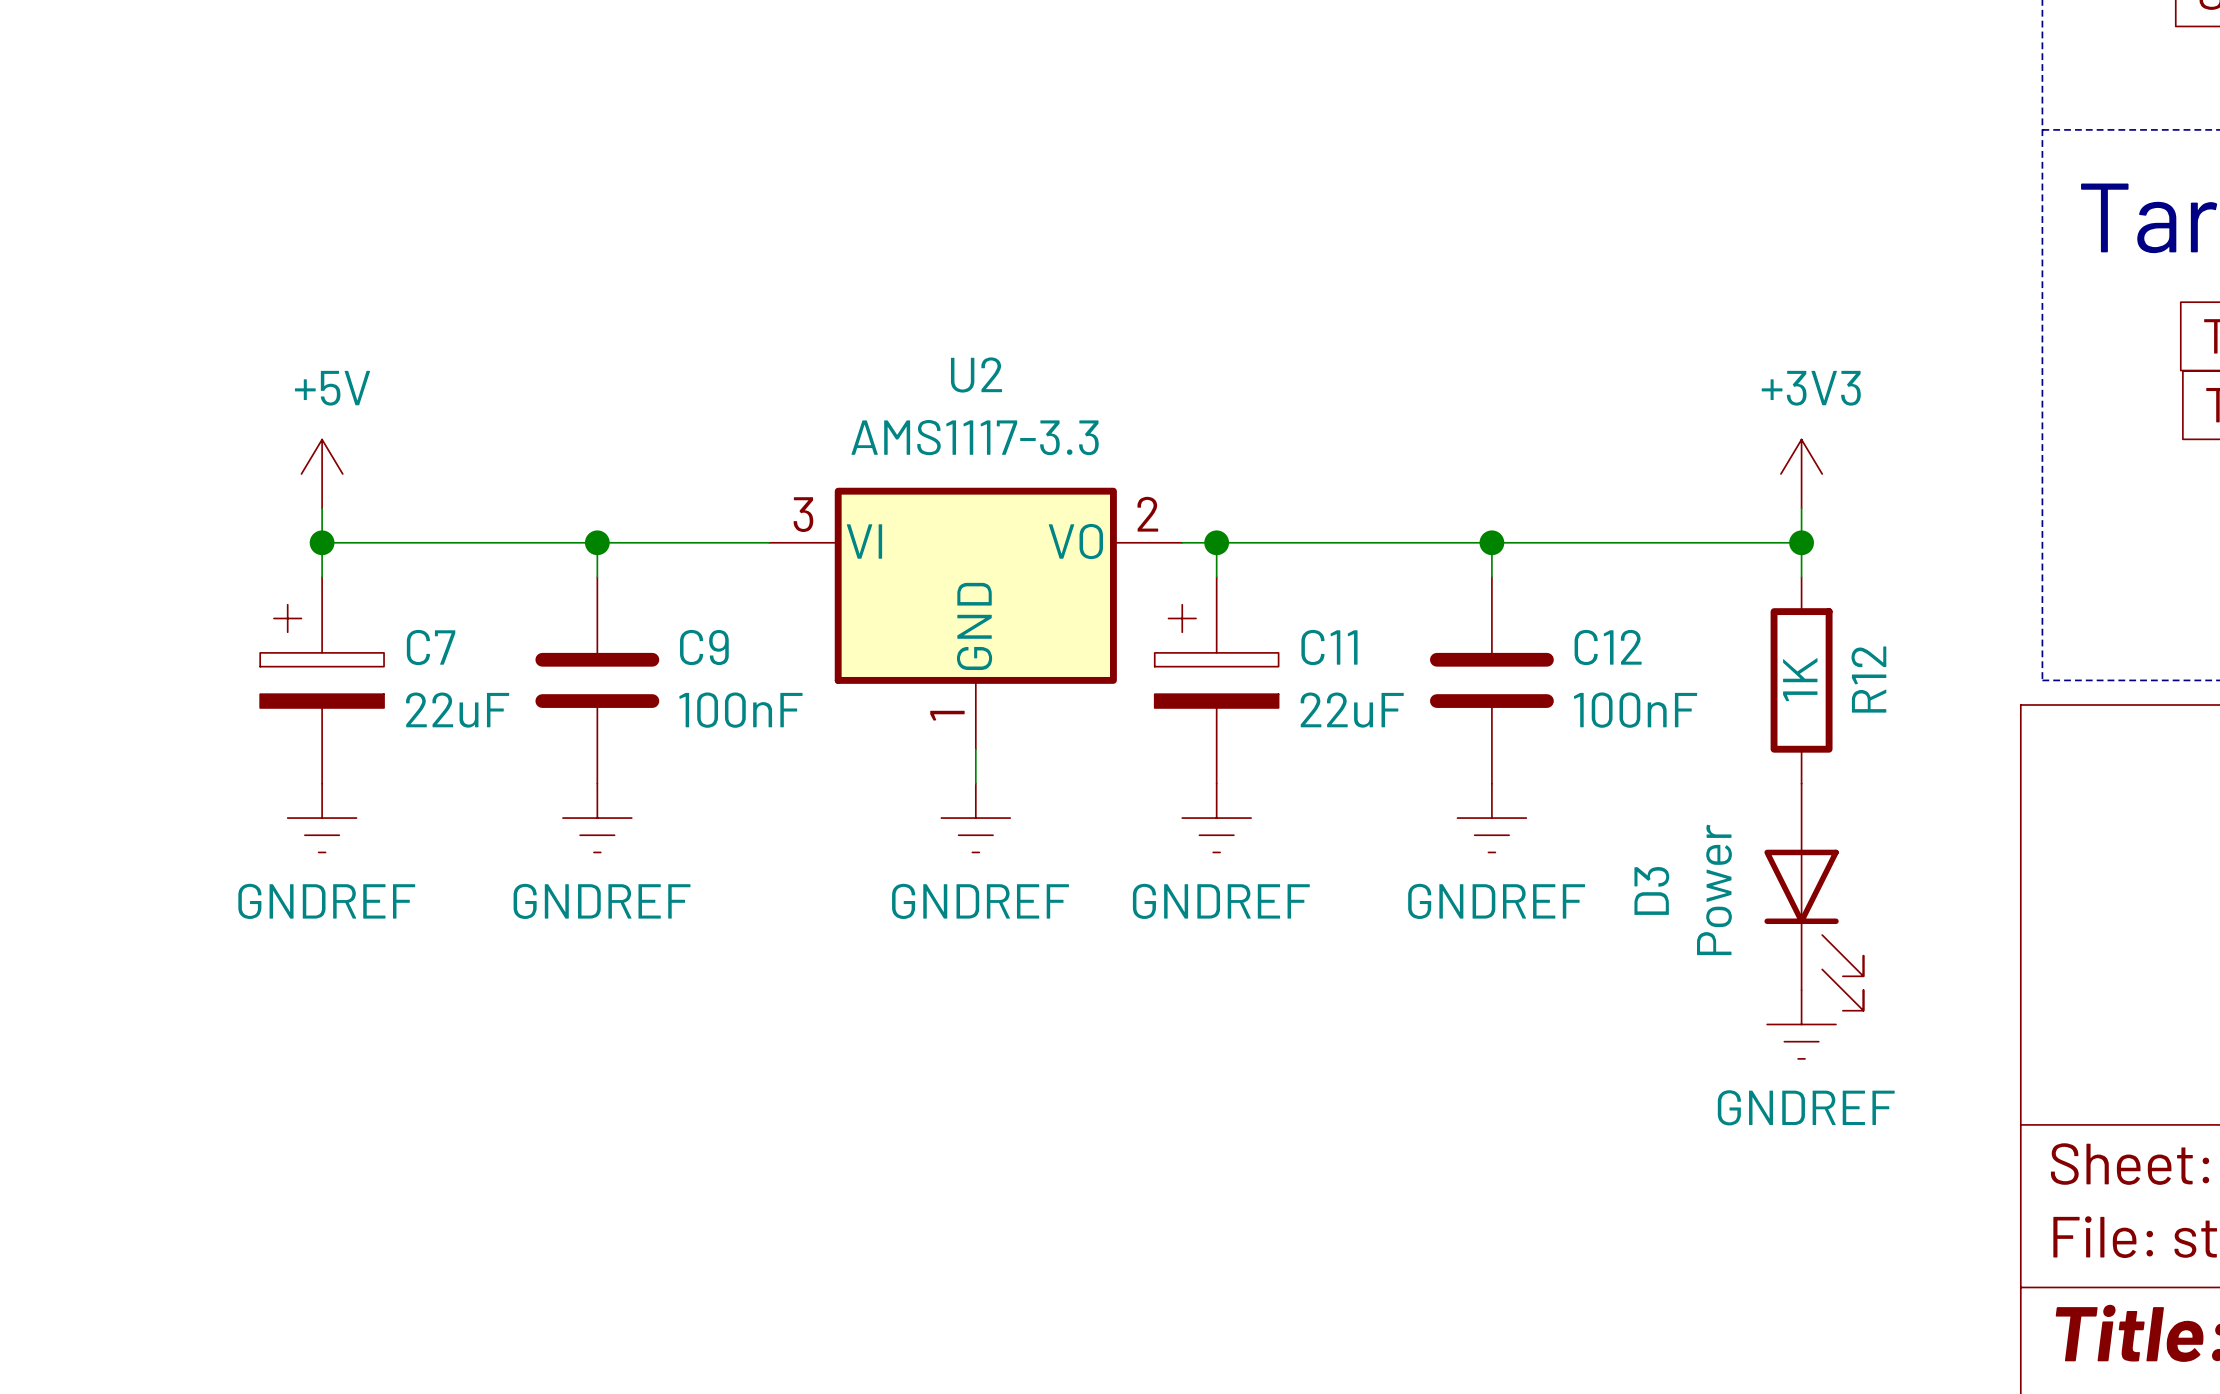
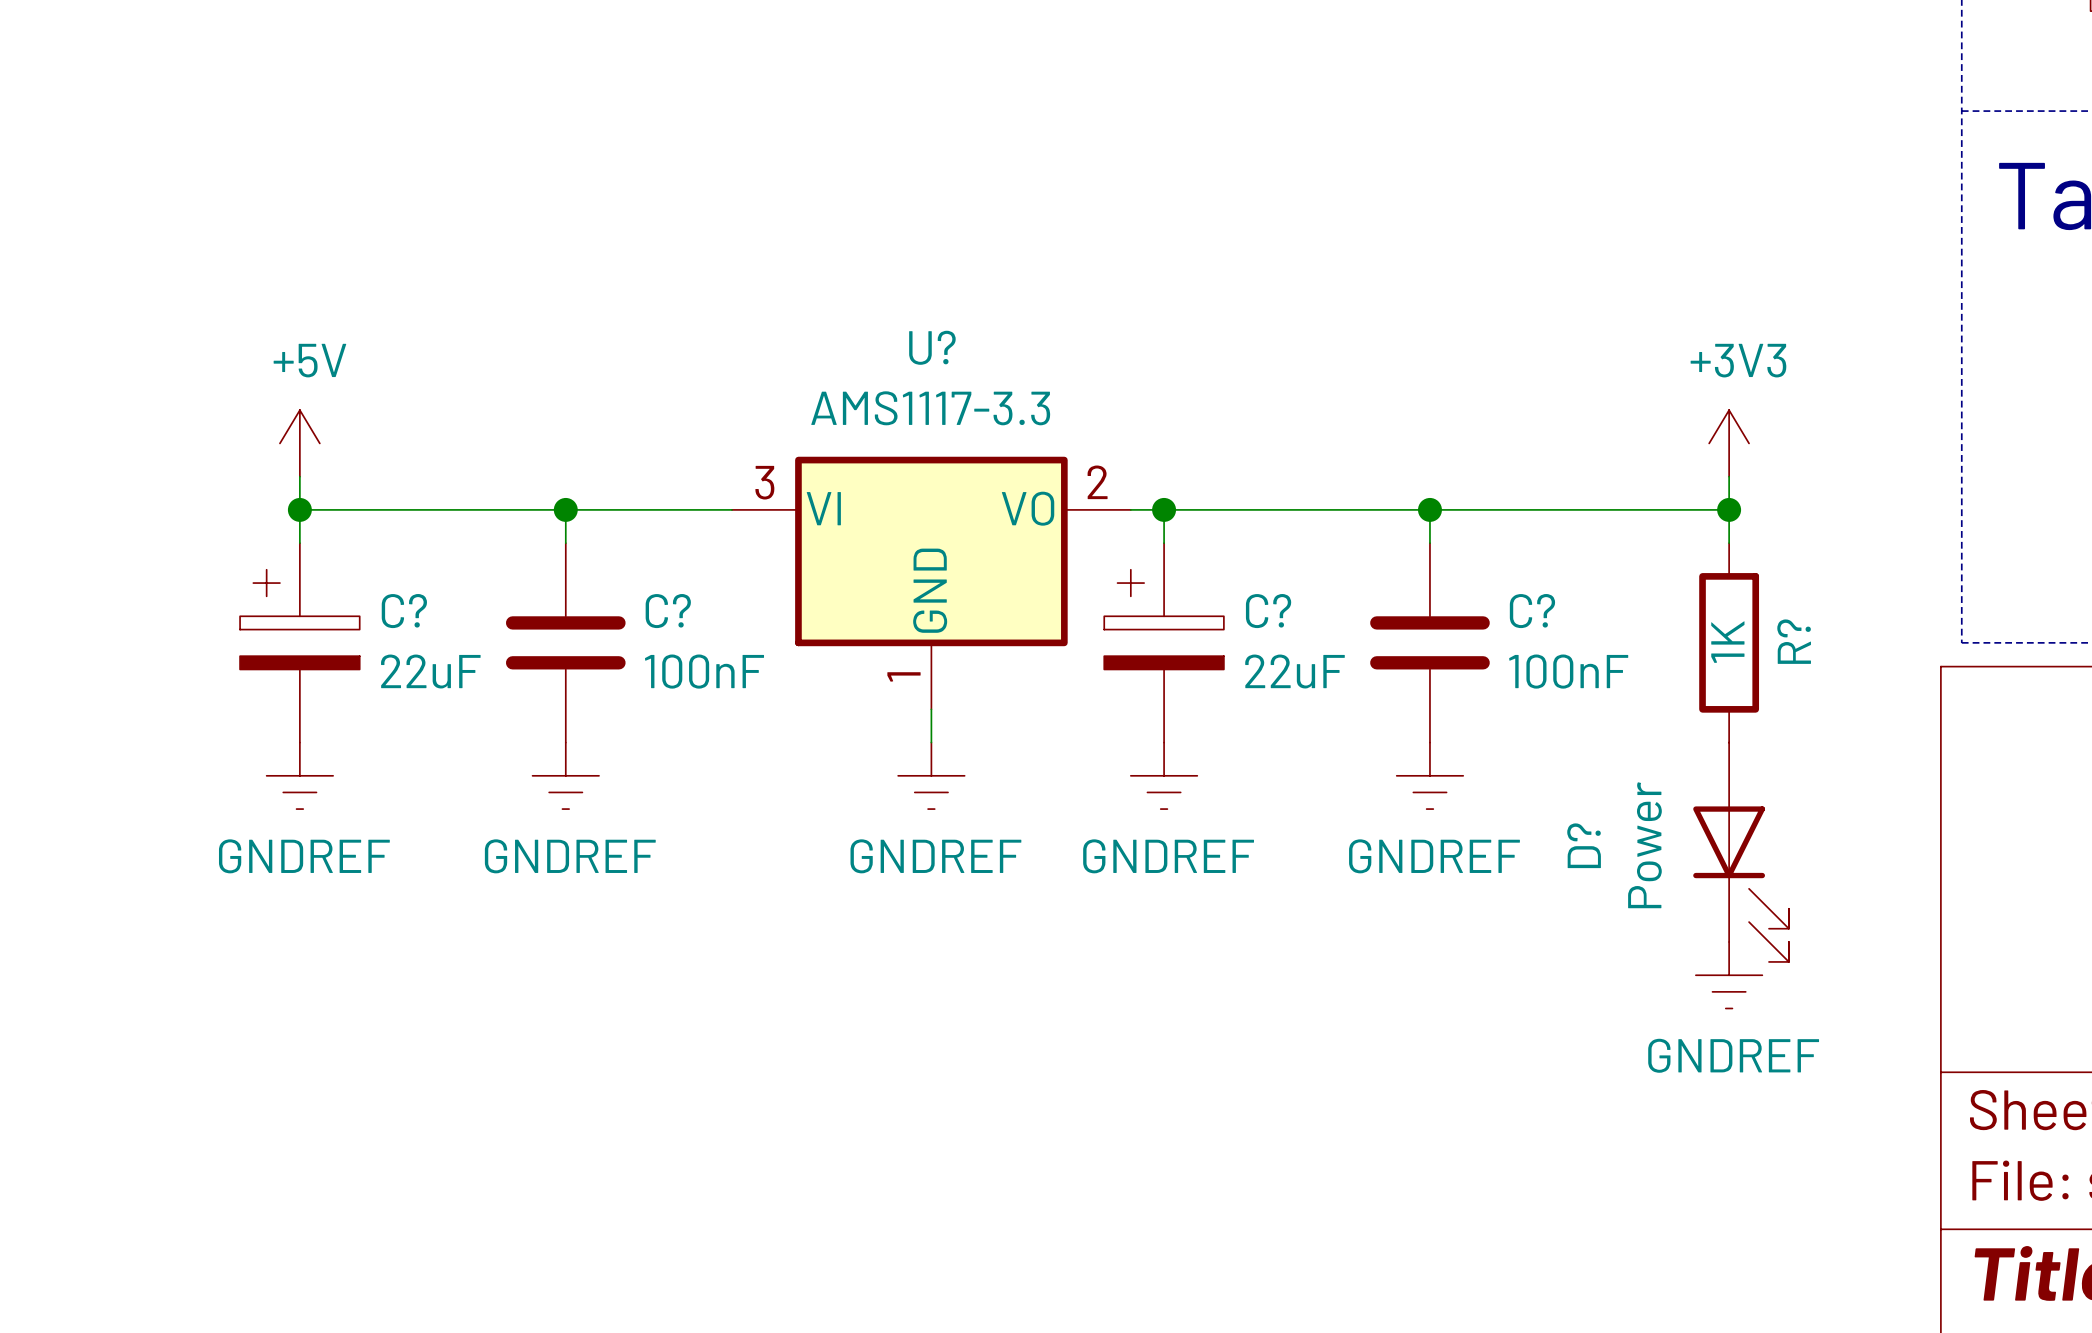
U2 name: U2 (976, 374) -> U? (932, 347)
C7 name: C7 (431, 647) -> C? (404, 611)
C9 name: C9 (704, 647) -> C? (668, 611)
C11 name: C11 (1329, 647) -> C? (1268, 611)
C12 name: C12 (1608, 647) -> C? (1532, 611)
R12 name: R12 (1868, 679) -> R? (1794, 641)
D3 name: D3 (1651, 890) -> D? (1584, 845)

